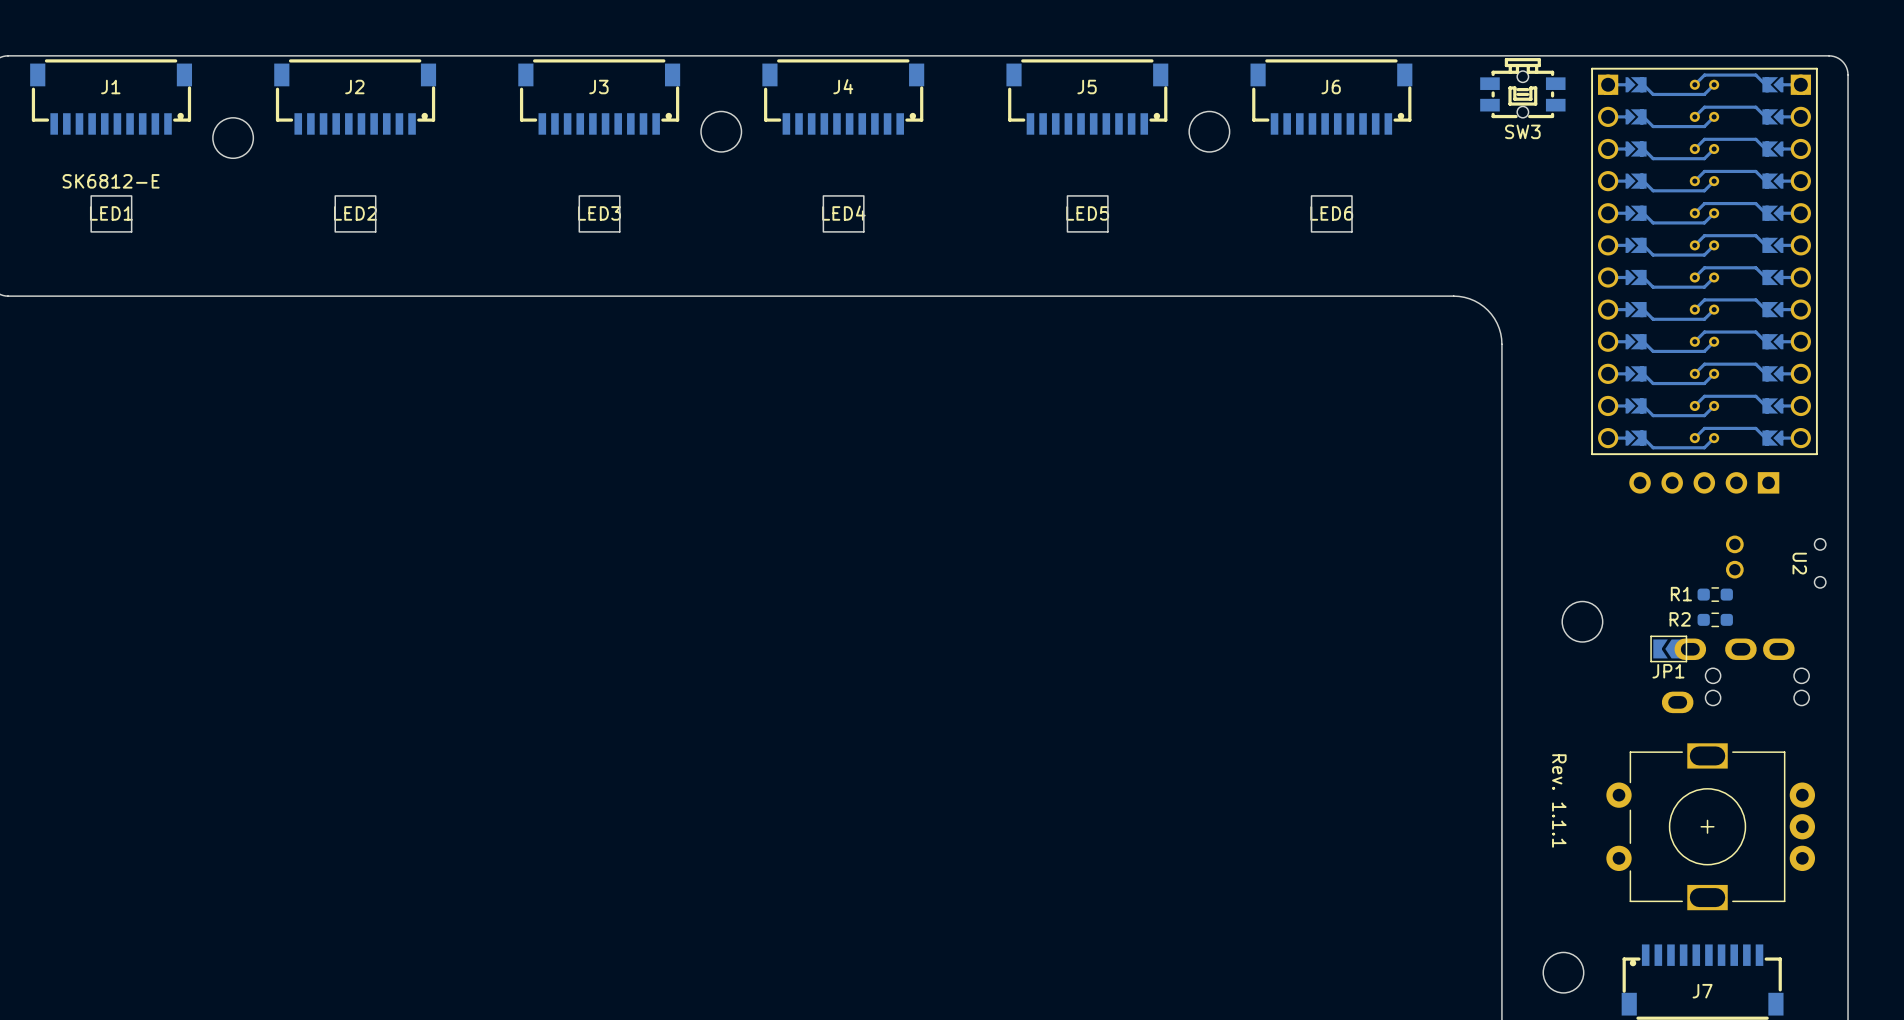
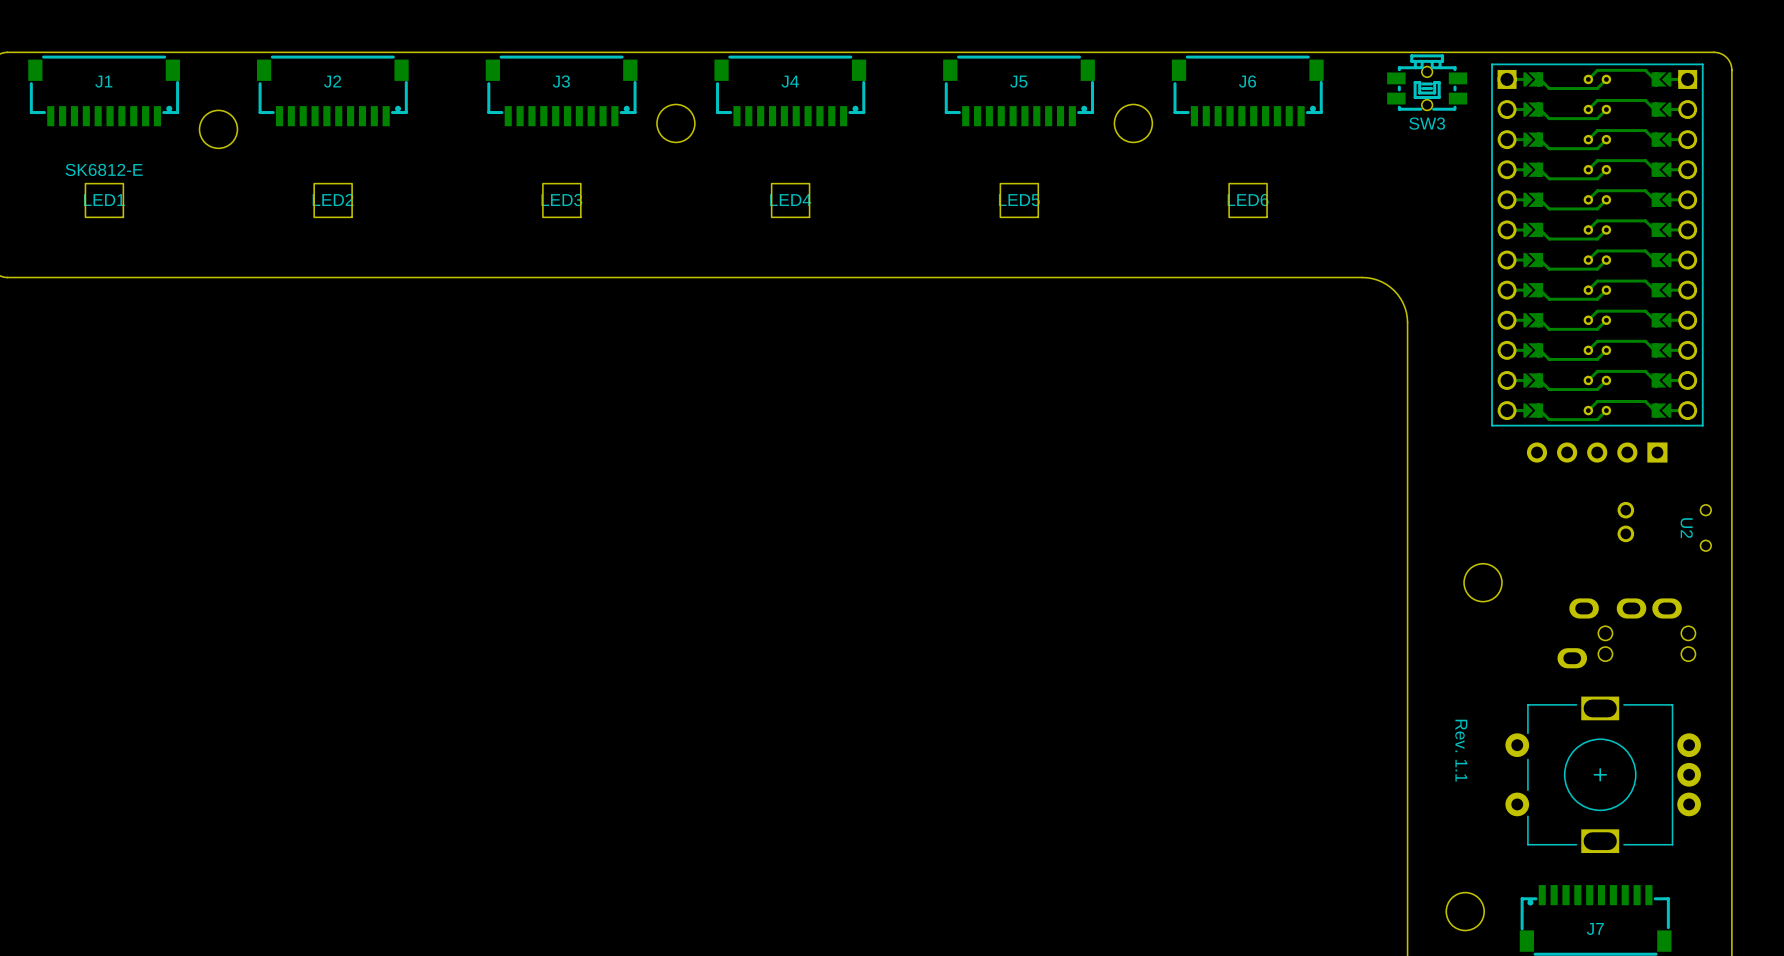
R1: (1715, 594) -> none
R2: (1715, 619) -> none
JP1: (1668, 648) -> none
text: Rev. 1.1.1 (1559, 801) -> Rev. 1.1 (1461, 750)

